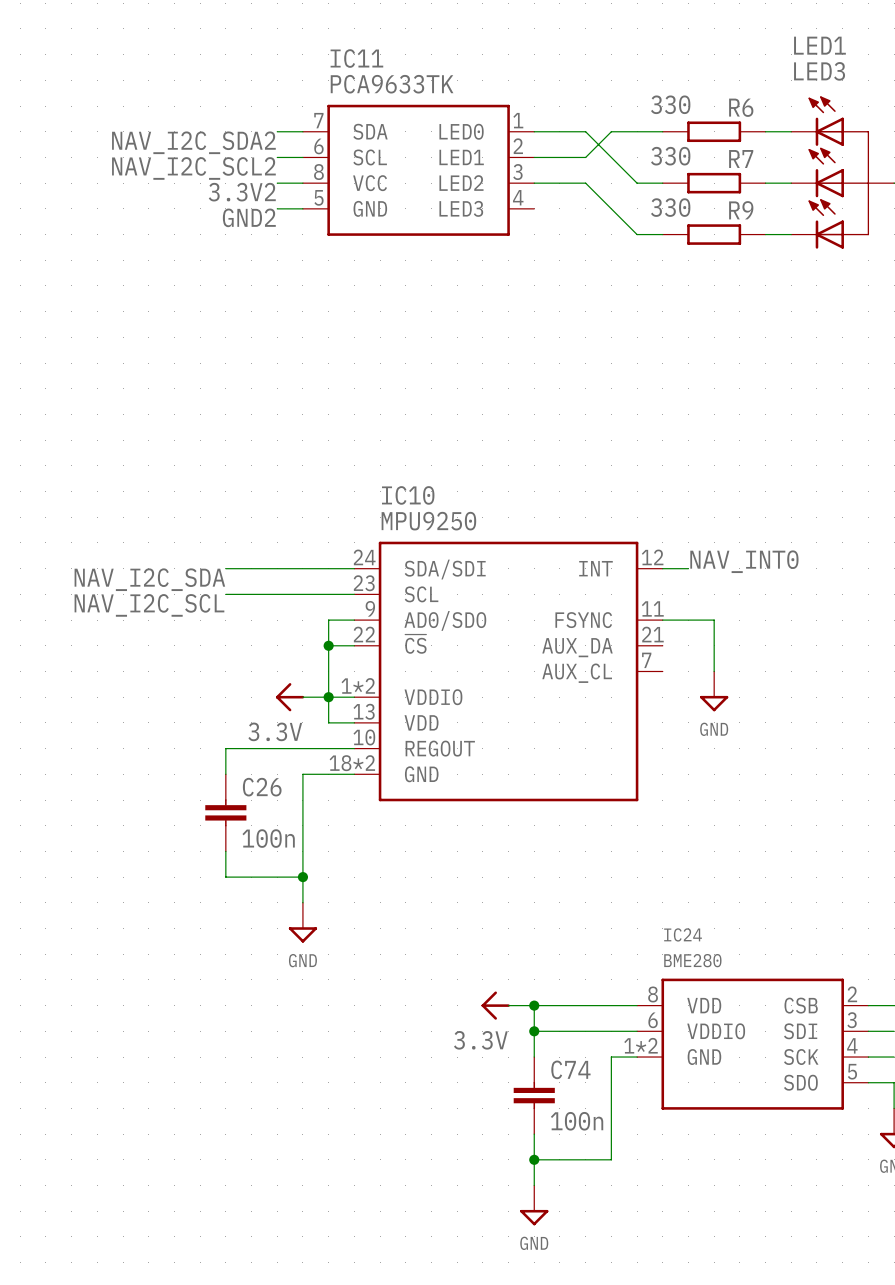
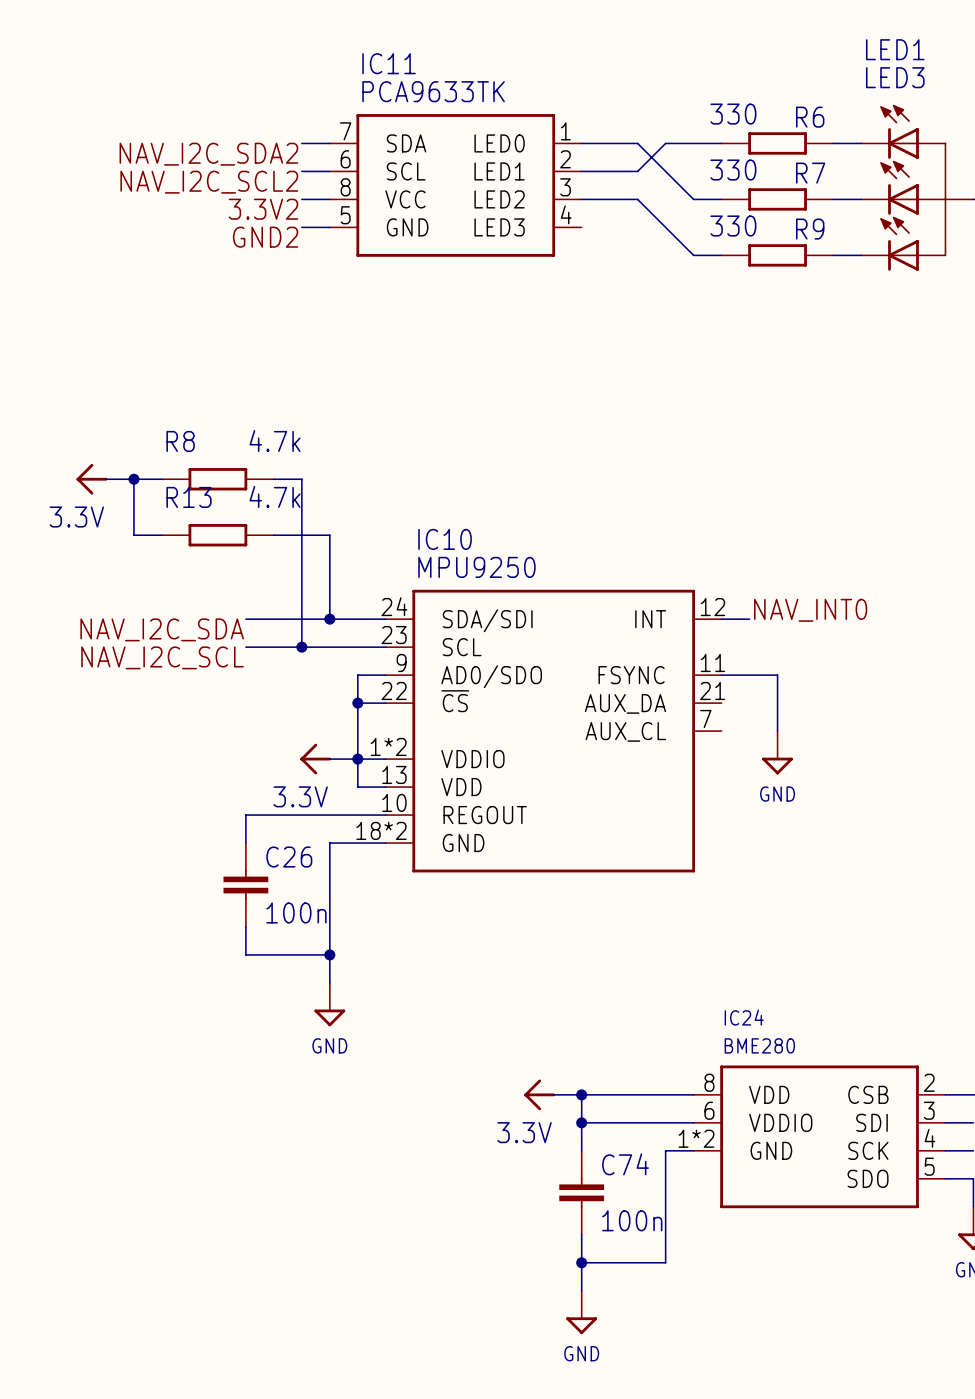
power symbol: none -> 3.3V (91, 479)
wire: none -> (105, 479) (161, 479)
wire: none -> (133, 479) (133, 535) (161, 535)
junction: none -> (133, 479)
R8: none -> 4.7k (217, 479)
wire: none -> (273, 479) (301, 479) (301, 647)
R13: none -> 4.7k (217, 535)
wire: none -> (273, 535) (329, 535) (329, 619)
junction: none -> (329, 619)
junction: none -> (301, 647)

